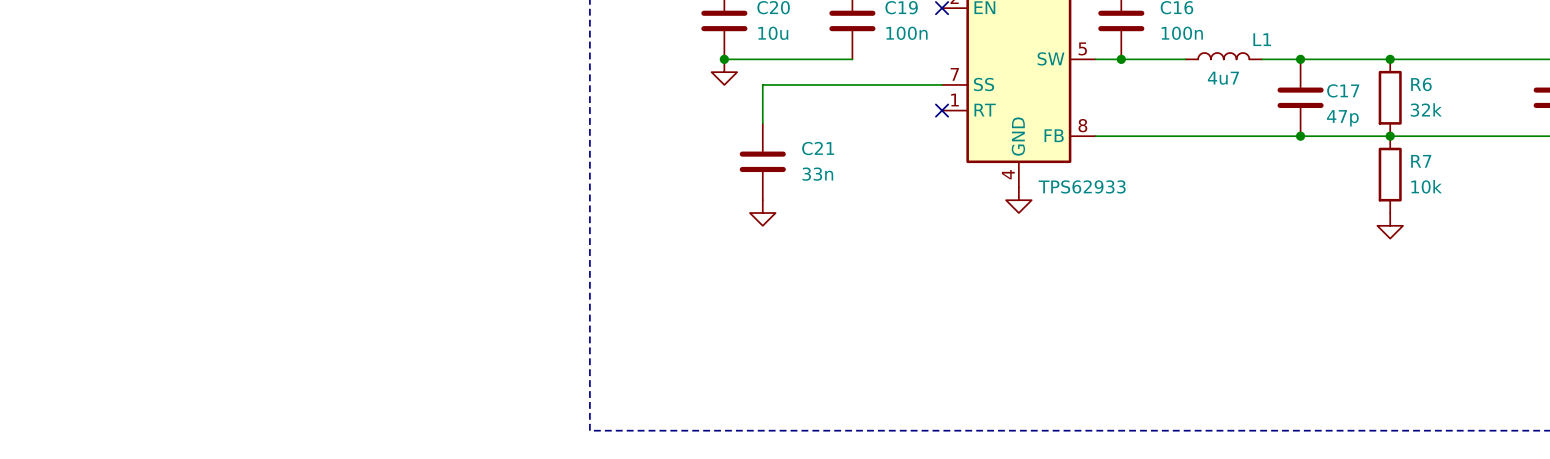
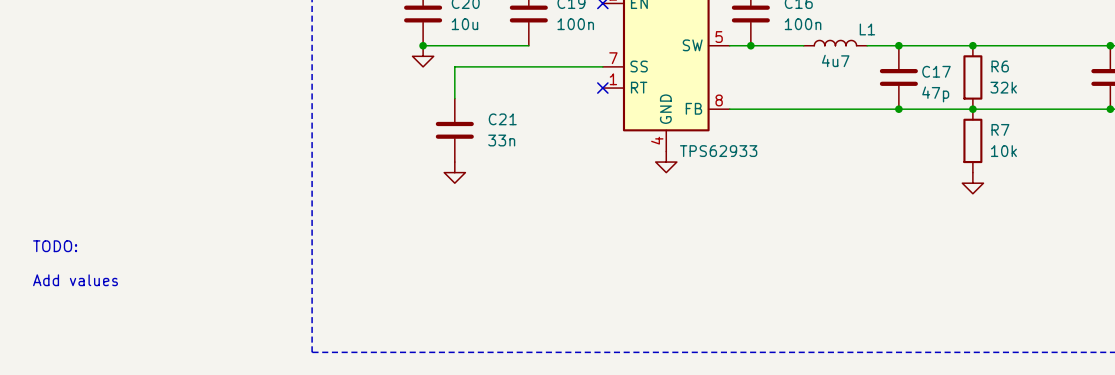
text: none -> TODO: (55, 246)
text: none -> Add values (75, 280)

